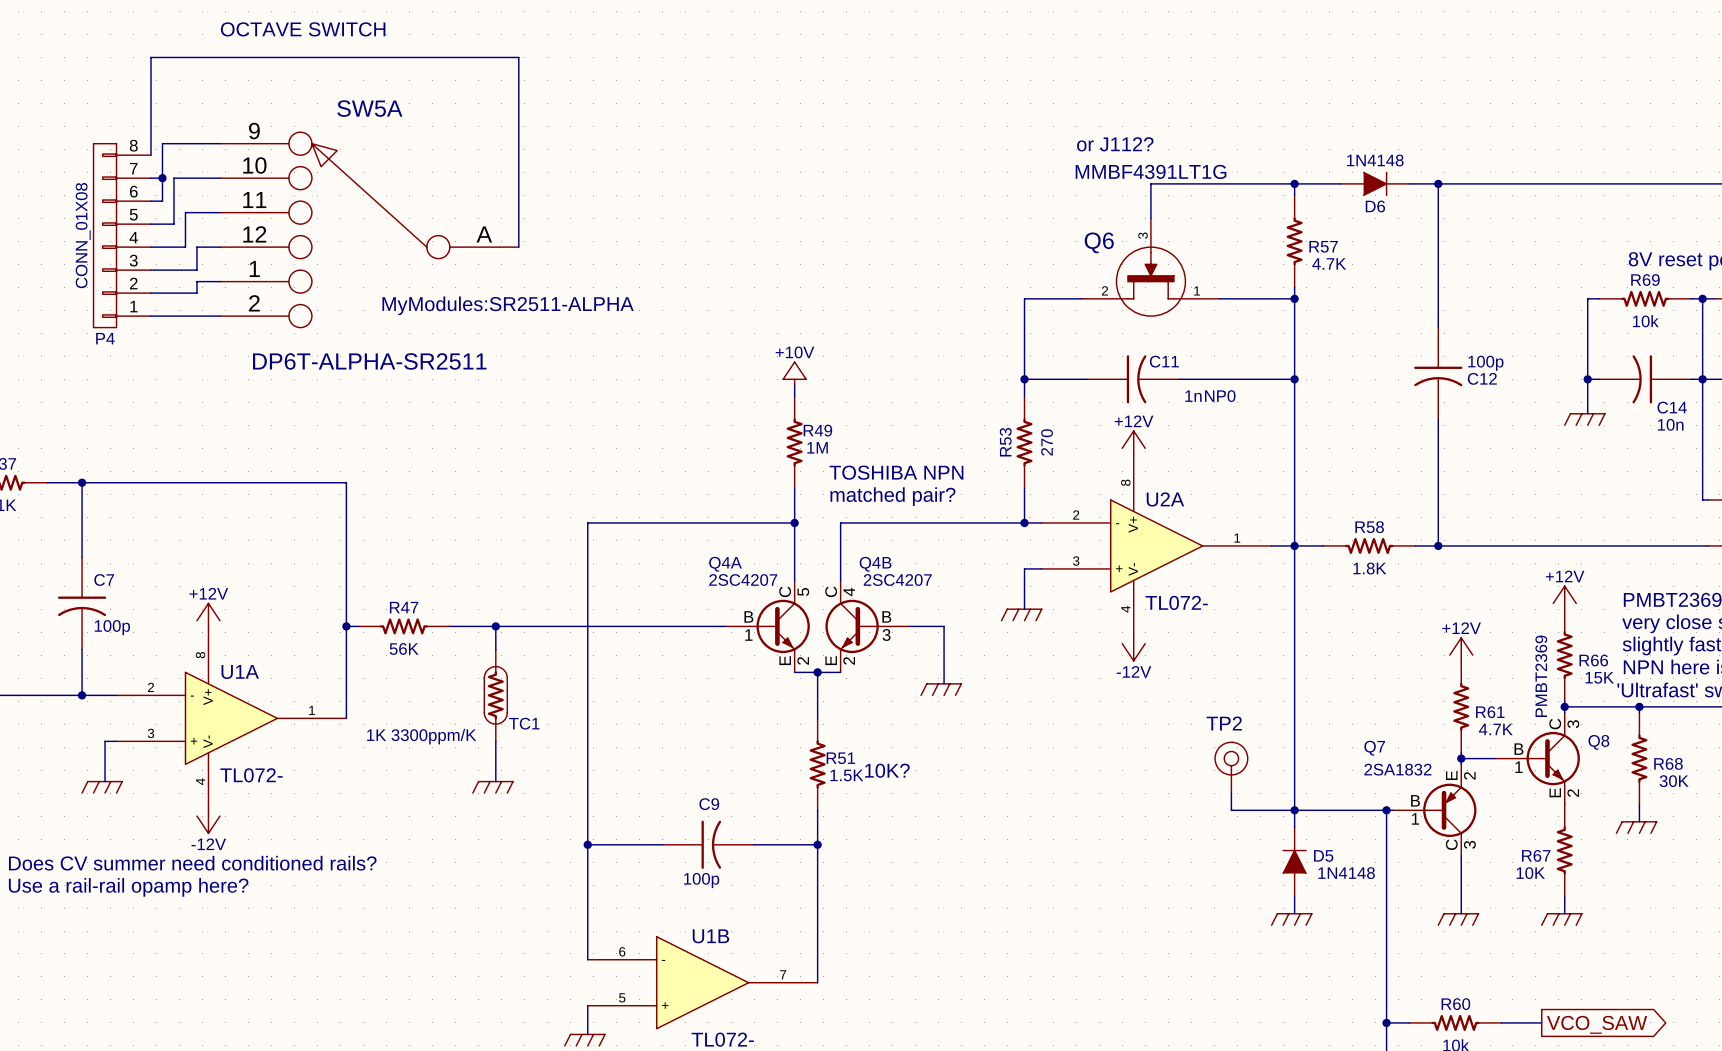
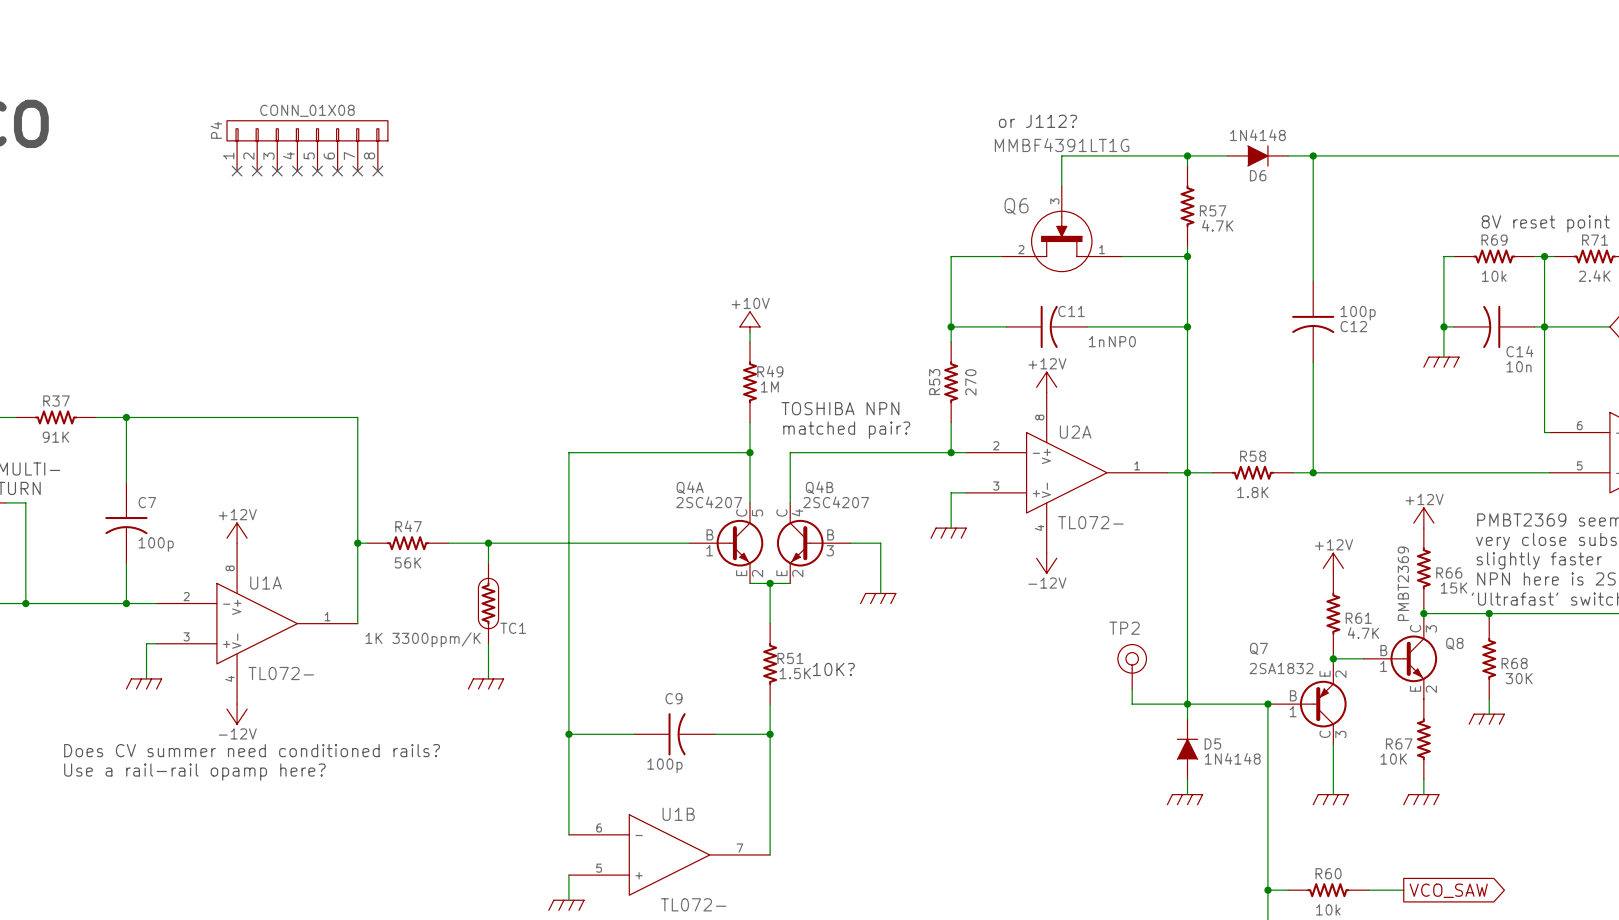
text: OCTAVE SWITCH (303, 29) -> none
wire: (219, 143) (162, 143) (162, 201) (150, 201) -> none
wire: (150, 155) (150, 57) (518, 57) (518, 247) -> none
wire: (150, 178) (162, 178) -> none
junction: (162, 178) -> none
wire: (219, 178) (173, 178) (173, 224) (150, 224) -> none
no-connect mark: none -> (237, 171)
no-connect mark: none -> (257, 171)
no-connect mark: none -> (277, 171)
no-connect mark: none -> (297, 171)
no-connect mark: none -> (317, 171)
no-connect mark: none -> (337, 171)
no-connect mark: none -> (357, 171)
no-connect mark: none -> (377, 171)
wire: (219, 212) (185, 212) (185, 247) (150, 247) -> none
SW5A: DP6T-ALPHA-SR2511 (369, 229) -> none
P4 rotation: 0° (105, 235) -> 90° clockwise (307, 130)
P4 position: (122, 235) -> (307, 145)
wire: (219, 247) (196, 247) (196, 270) (150, 270) -> none
wire: (219, 281) (196, 281) (196, 293) (150, 293) -> none
wire: (150, 316) (219, 316) -> none

